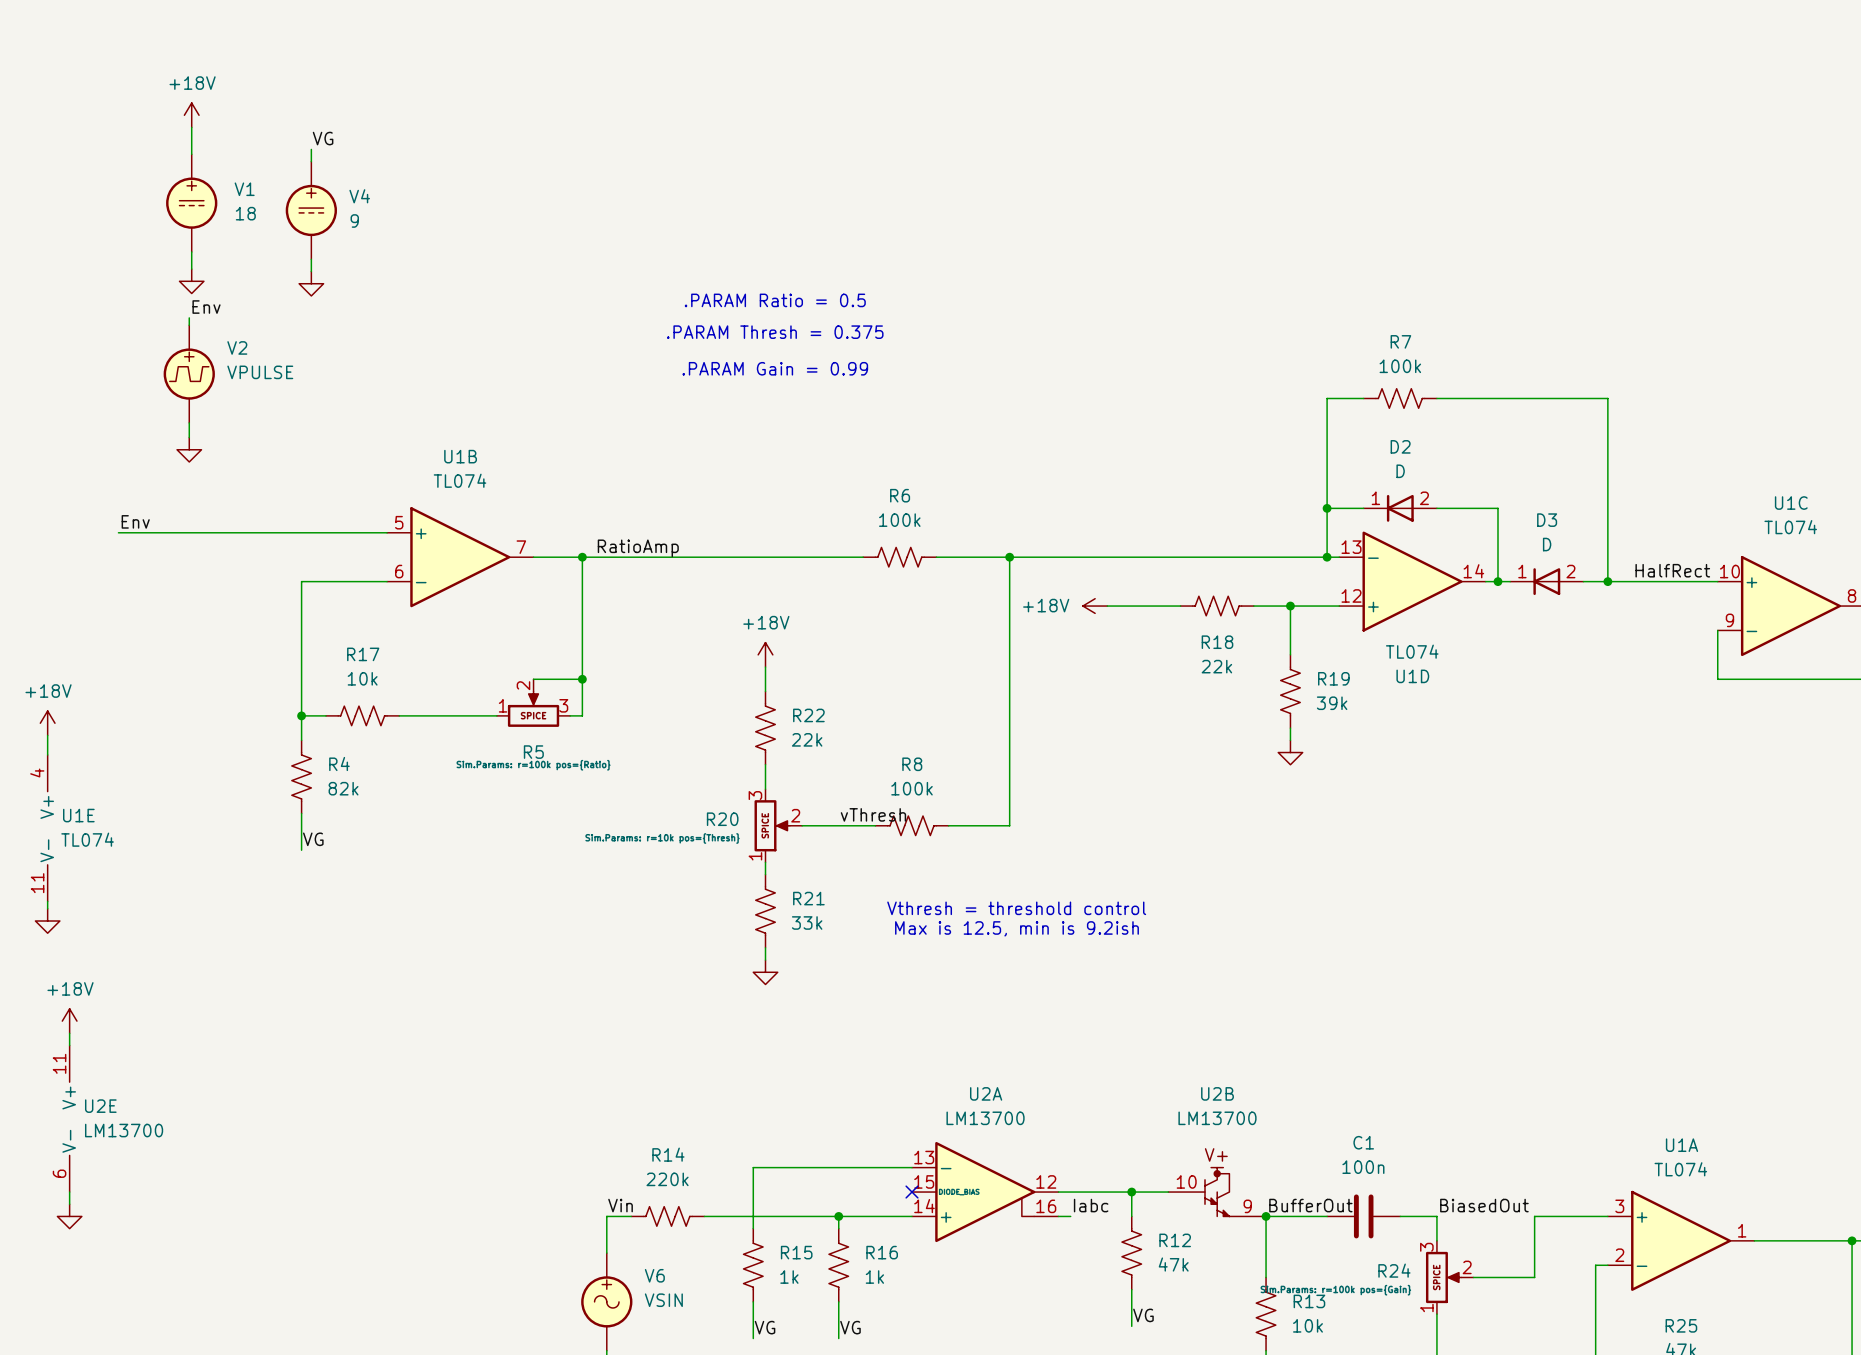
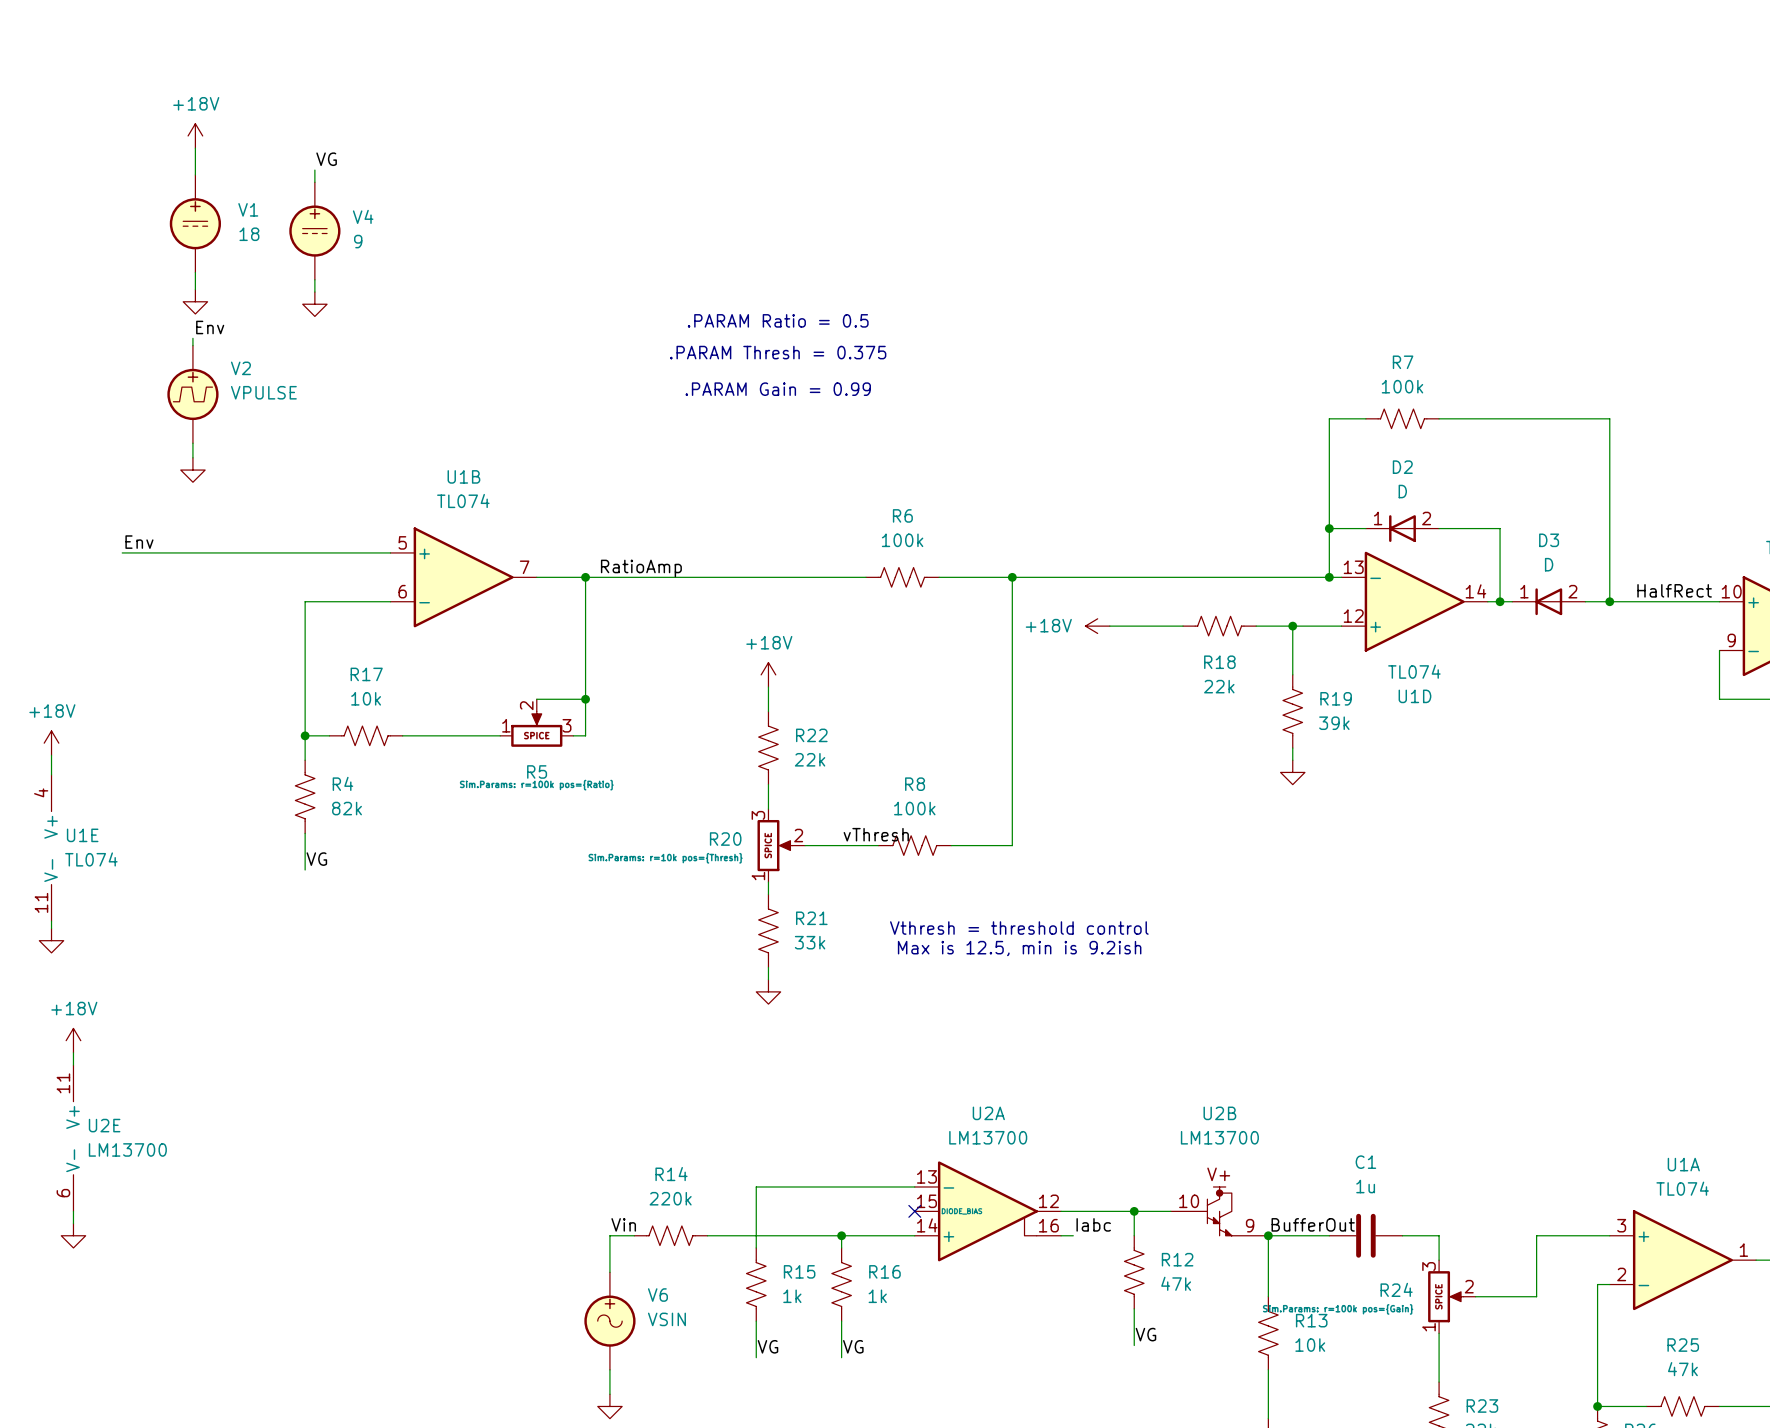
C1 value: 100n (1363, 1167) -> 1u (1365, 1186)
label: BiasedOut (1484, 1205) -> none

